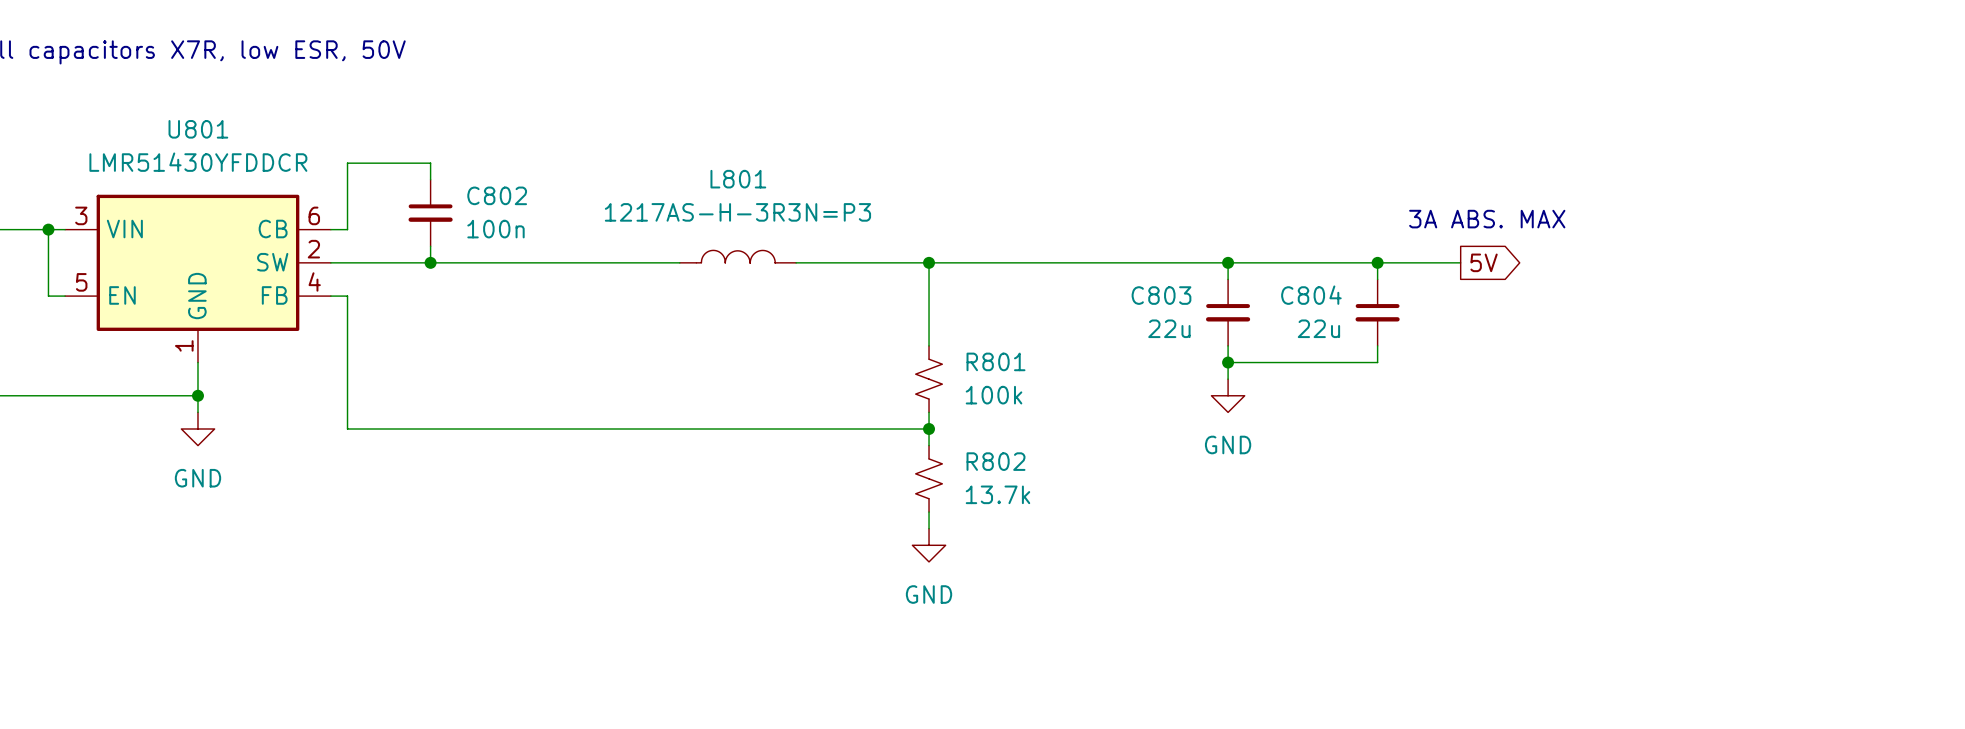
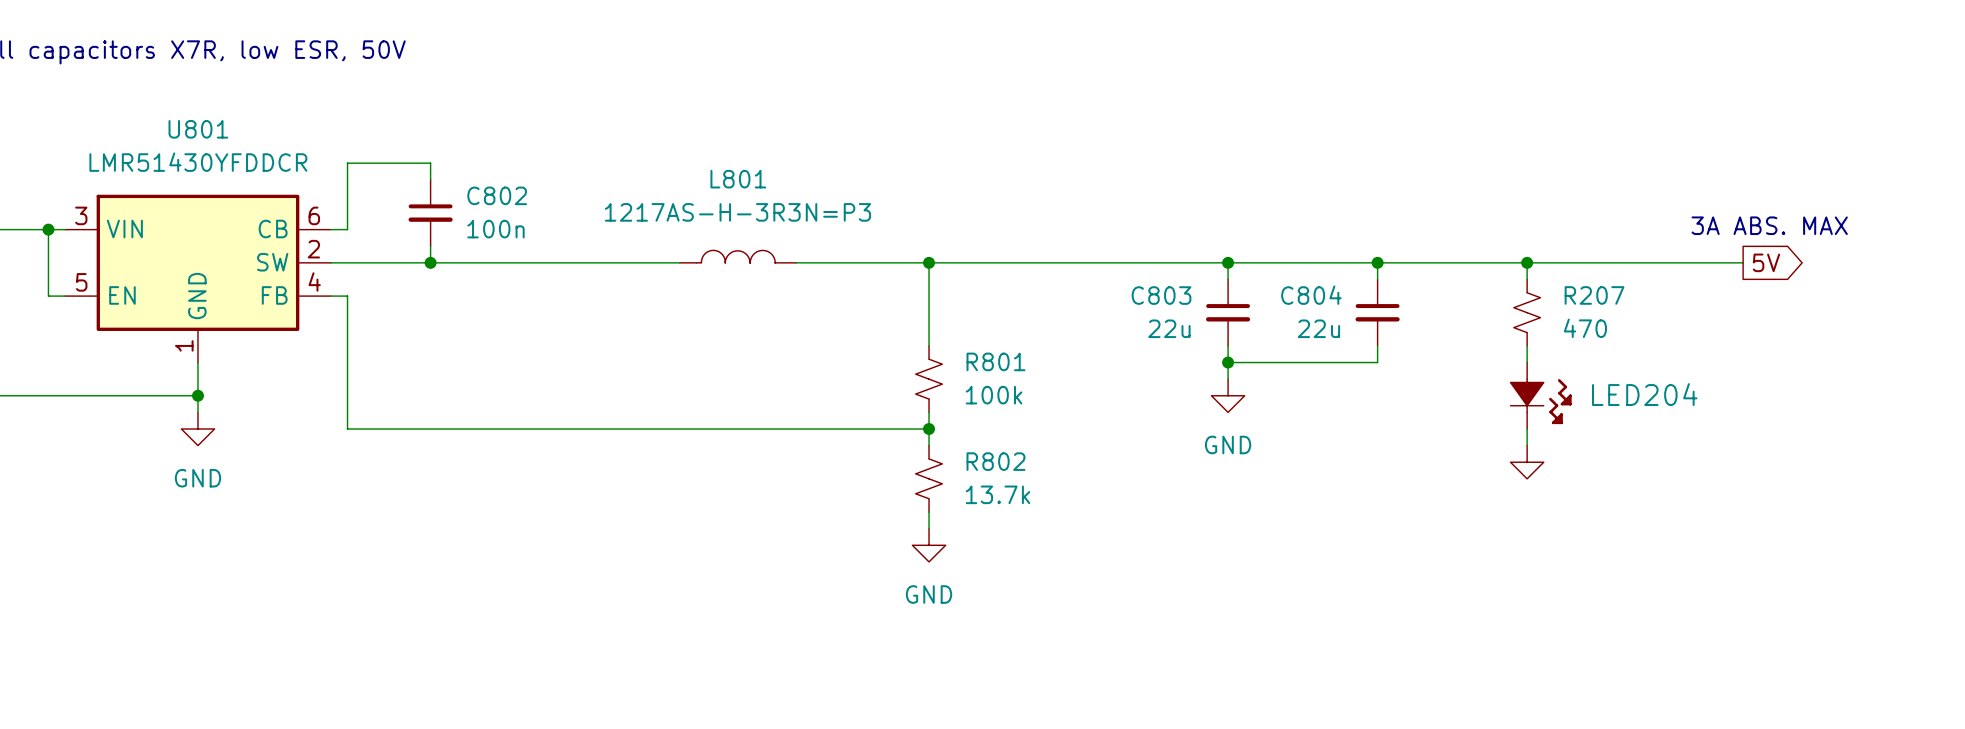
text position: 3A ABS. MAX (1487, 219) -> 3A ABS. MAX (1769, 225)
wire: none -> (1460, 262) (1743, 262)
global label position: 5V (1484, 262) -> 5V (1766, 262)
wire: none -> (1527, 262) (1527, 279)
junction: none -> (1527, 262)
R207: none -> 470 (1527, 312)
wire: none -> (1527, 345) (1527, 362)
LED204: none -> (1541, 395)
wire: none -> (1527, 428) (1527, 445)
power symbol: none -> (1527, 462)

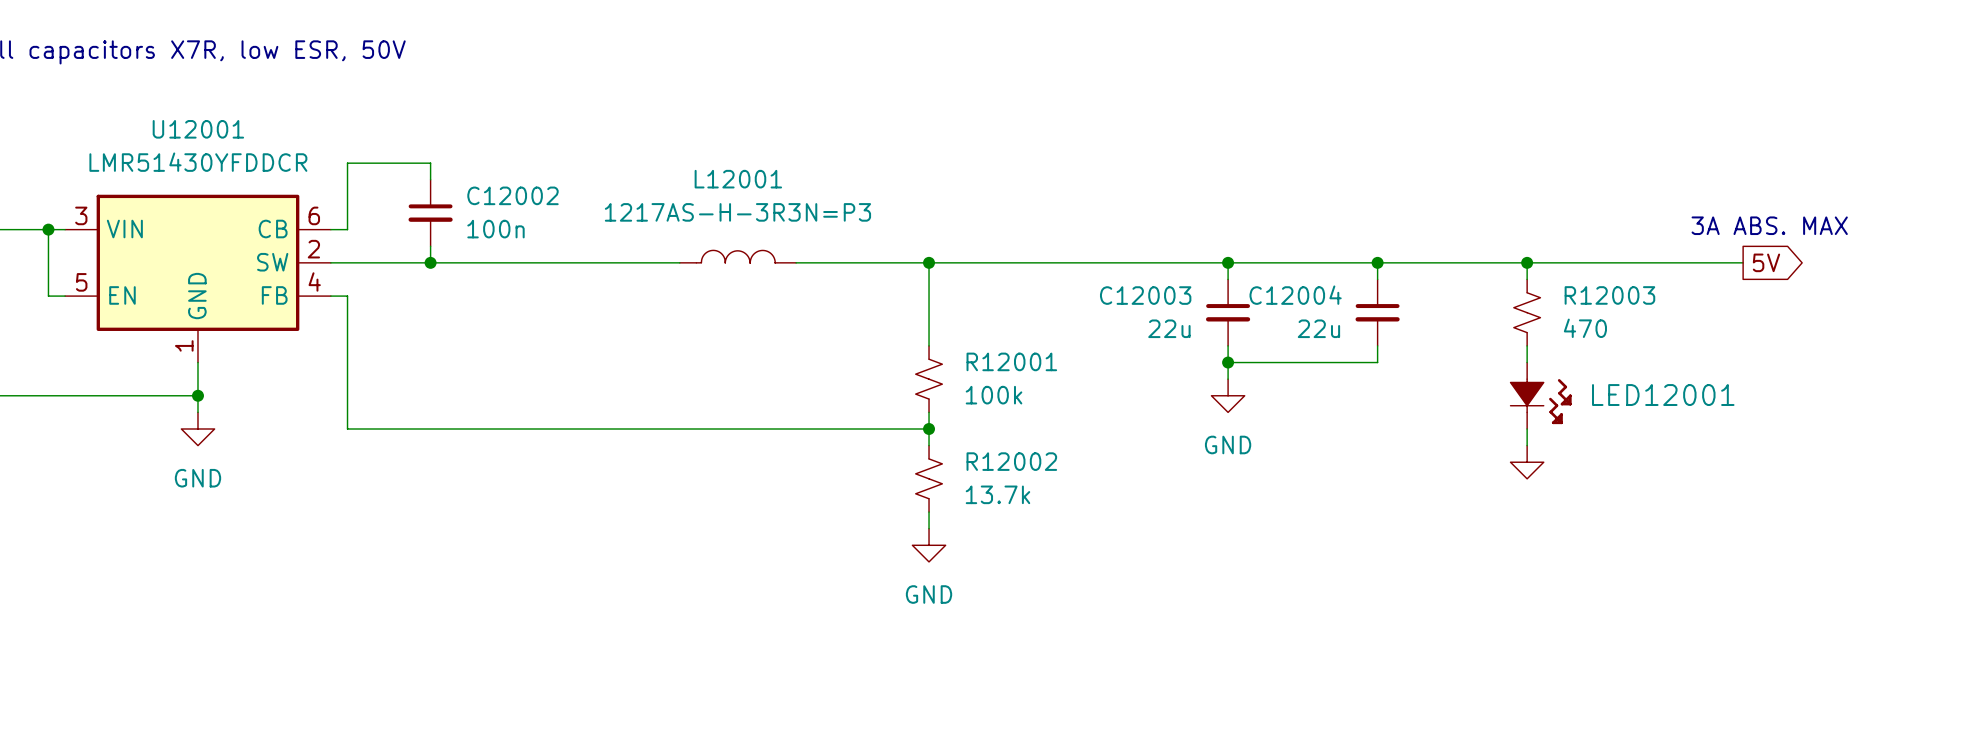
U801 name: U801 (198, 129) -> U12001 (198, 129)
L801 name: L801 (738, 179) -> L12001 (738, 179)
C802 name: C802 (497, 195) -> C12002 (512, 195)
C803 name: C803 (1161, 295) -> C12003 (1145, 295)
C804 name: C804 (1311, 295) -> C12004 (1295, 295)
R207 name: R207 (1594, 295) -> R12003 (1609, 295)
R801 name: R801 (995, 361) -> R12001 (1011, 361)
LED204 name: LED204 (1644, 394) -> LED12001 (1663, 395)
R802 name: R802 (995, 461) -> R12002 (1011, 461)

